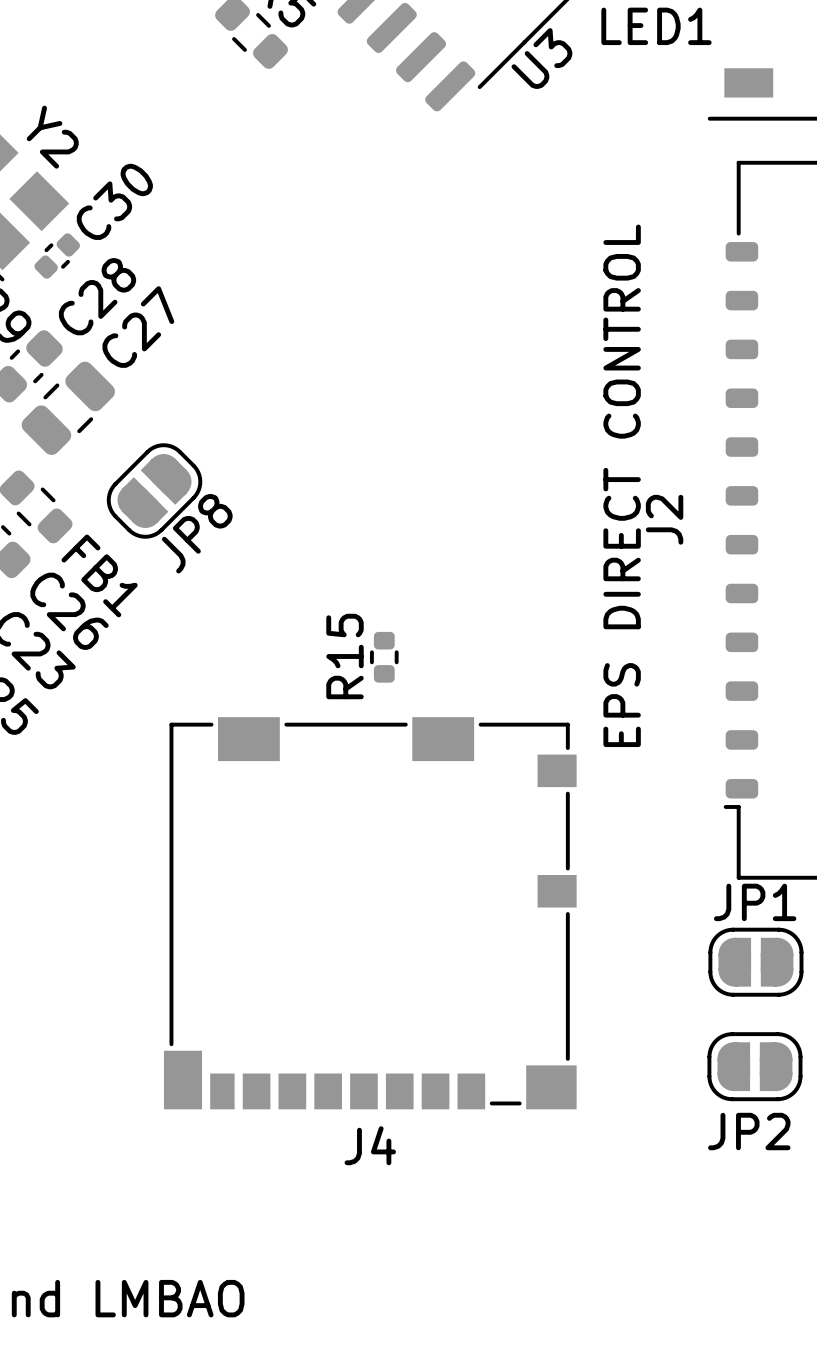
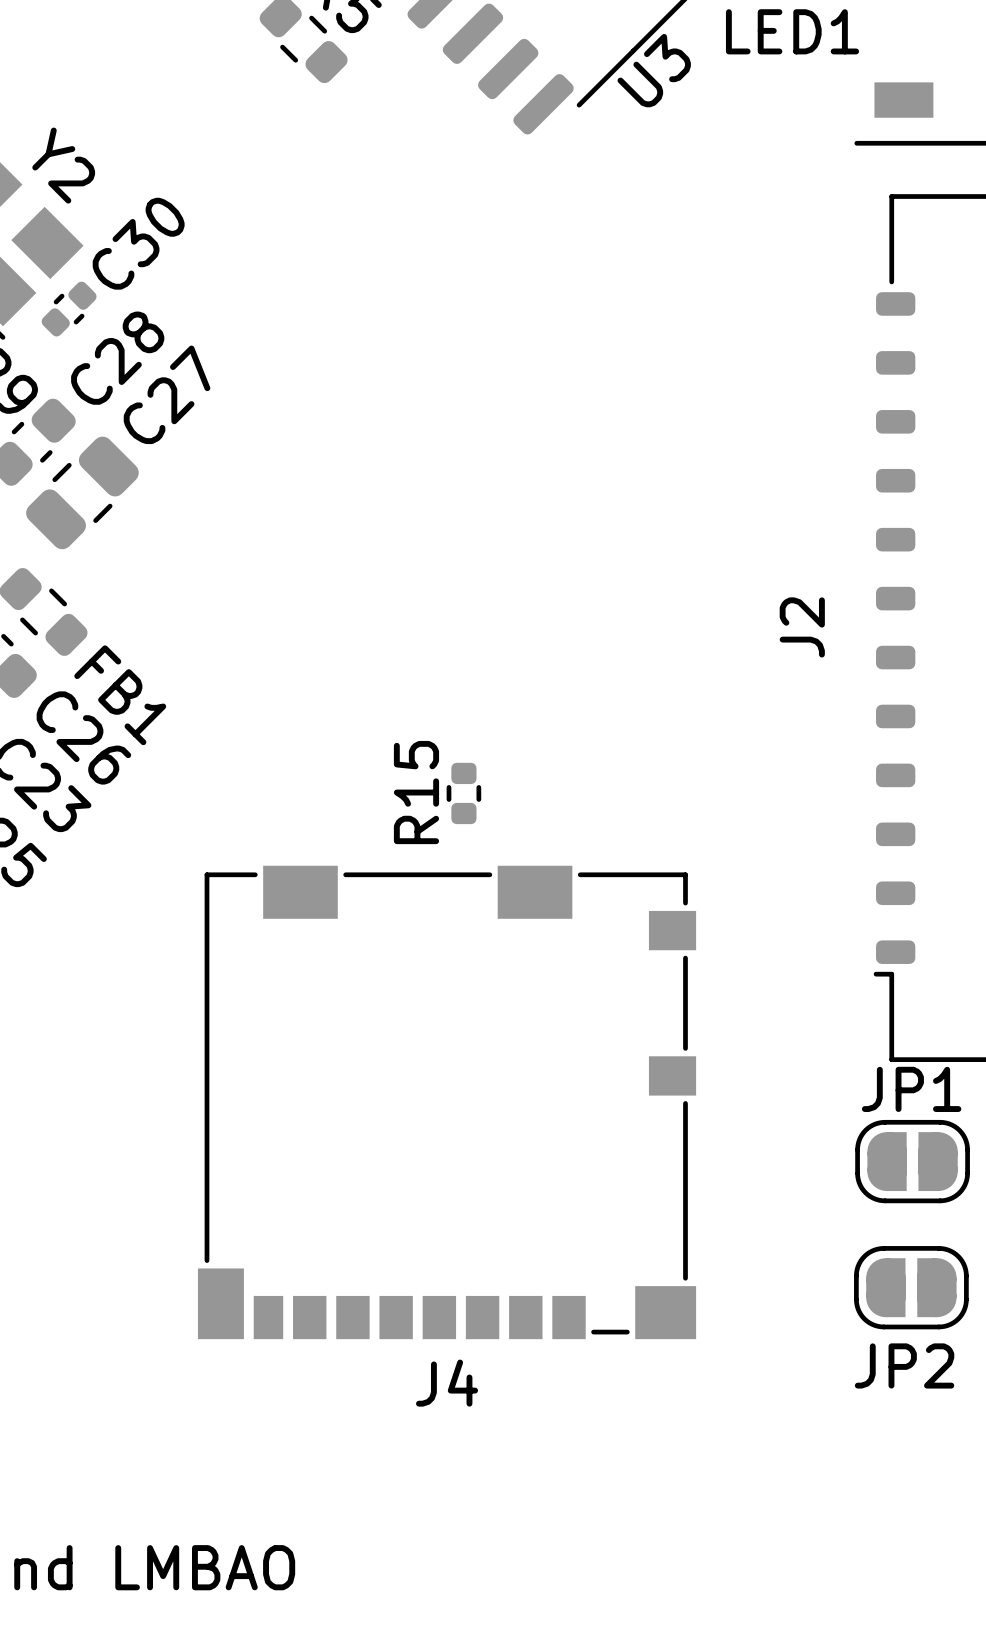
text: EPS DIRECT CONTROL (622, 485) -> none
JP8: (154, 491) -> none

